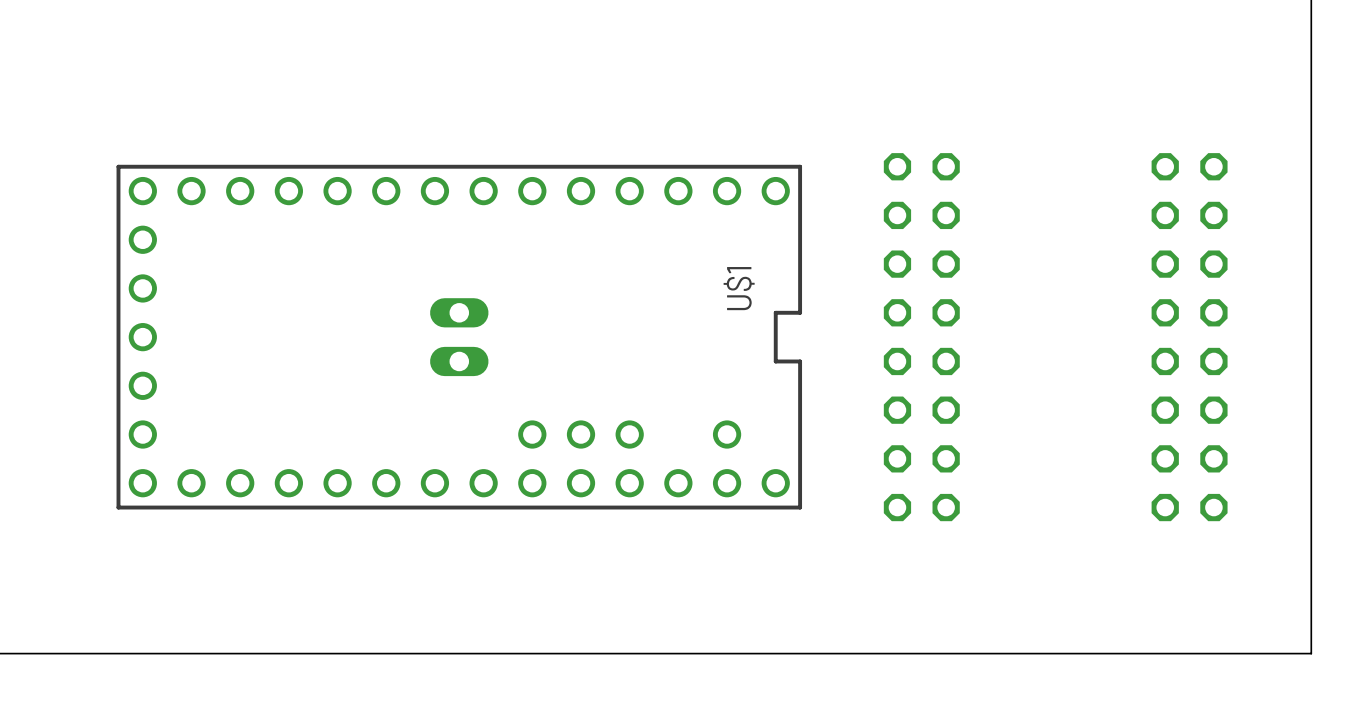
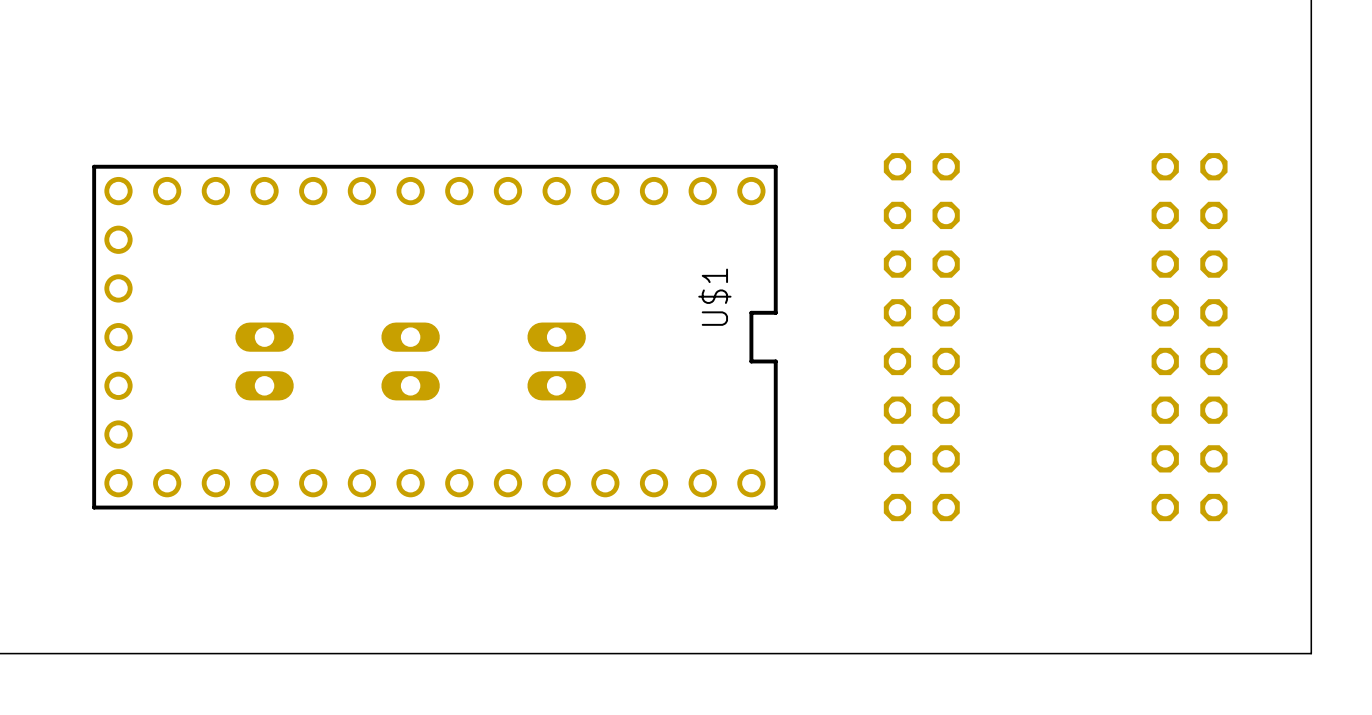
U$1 footprint: [116, 164, 803, 510] -> [92, 164, 778, 510]
part: (459, 337) -> none
part: none -> (264, 361)
part: none -> (410, 361)
part: none -> (556, 361)

